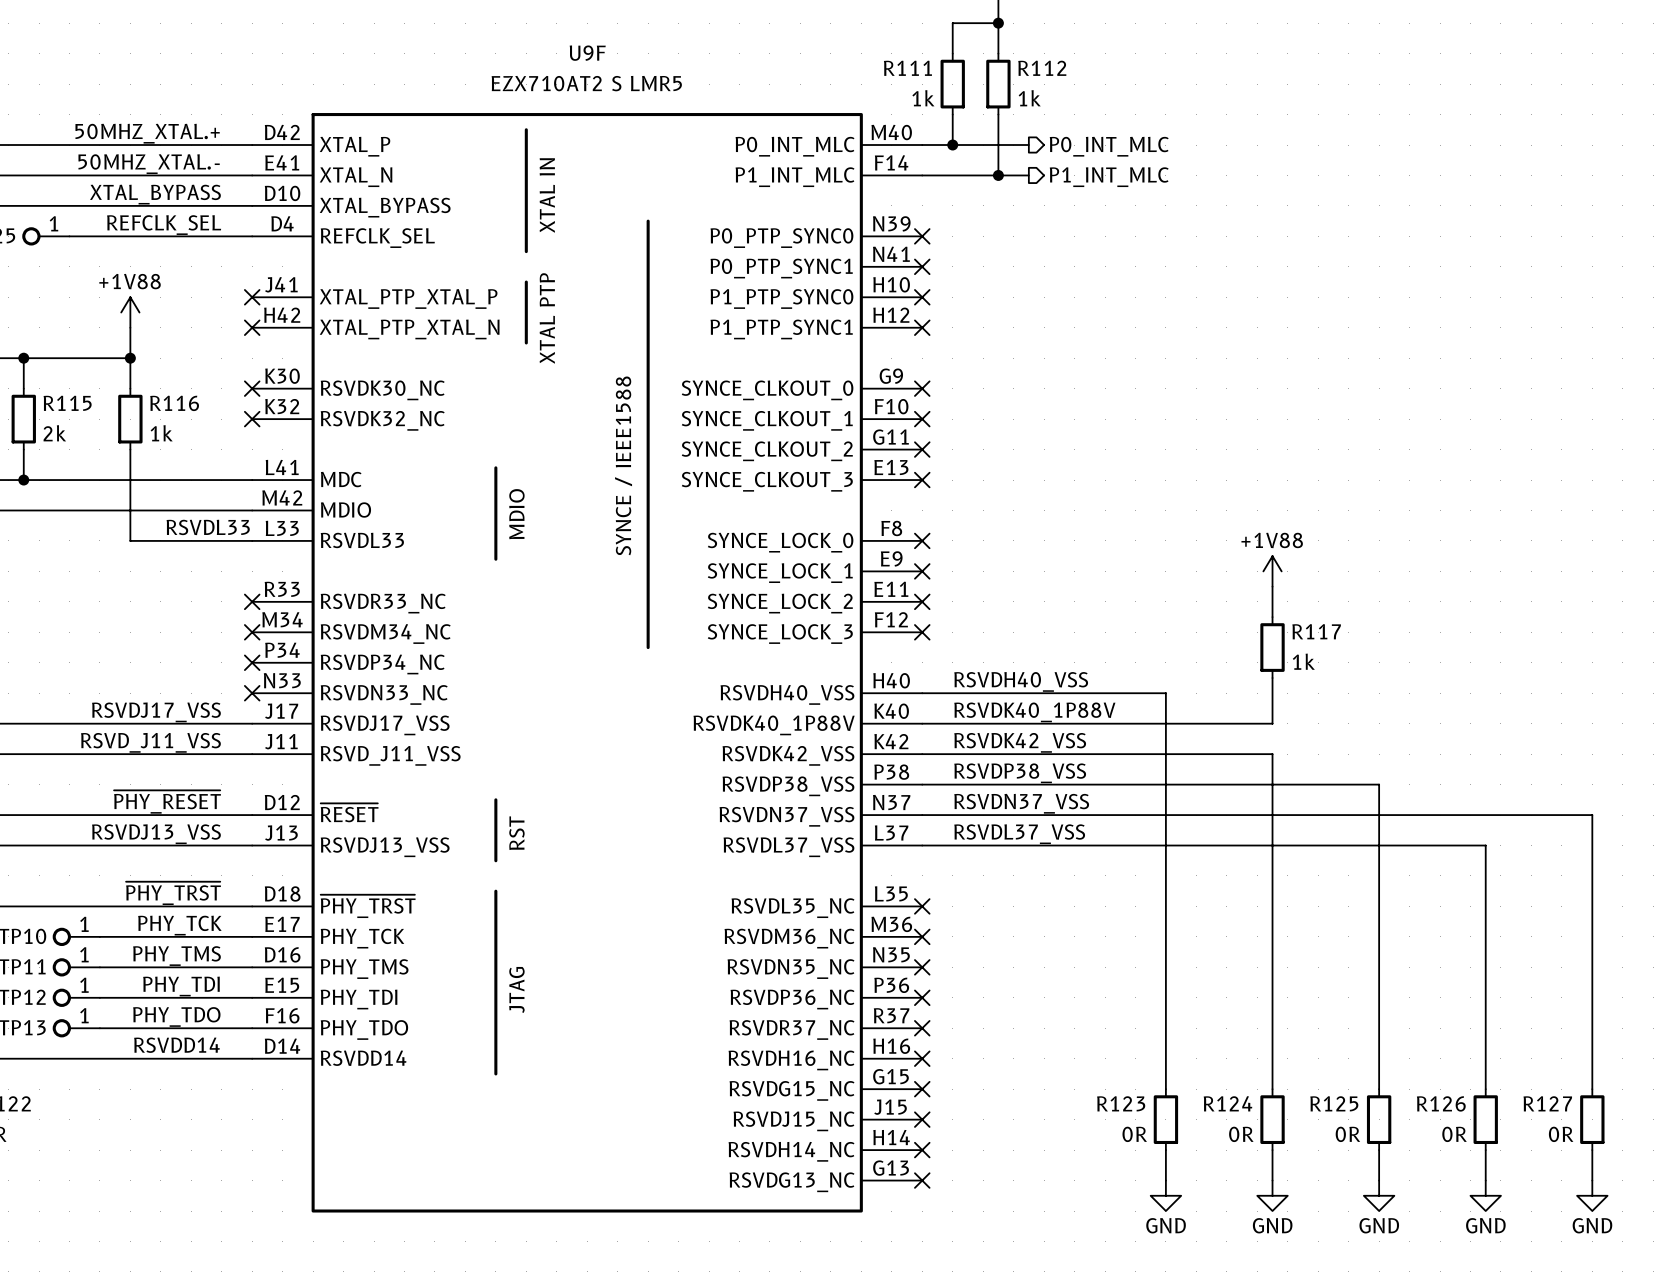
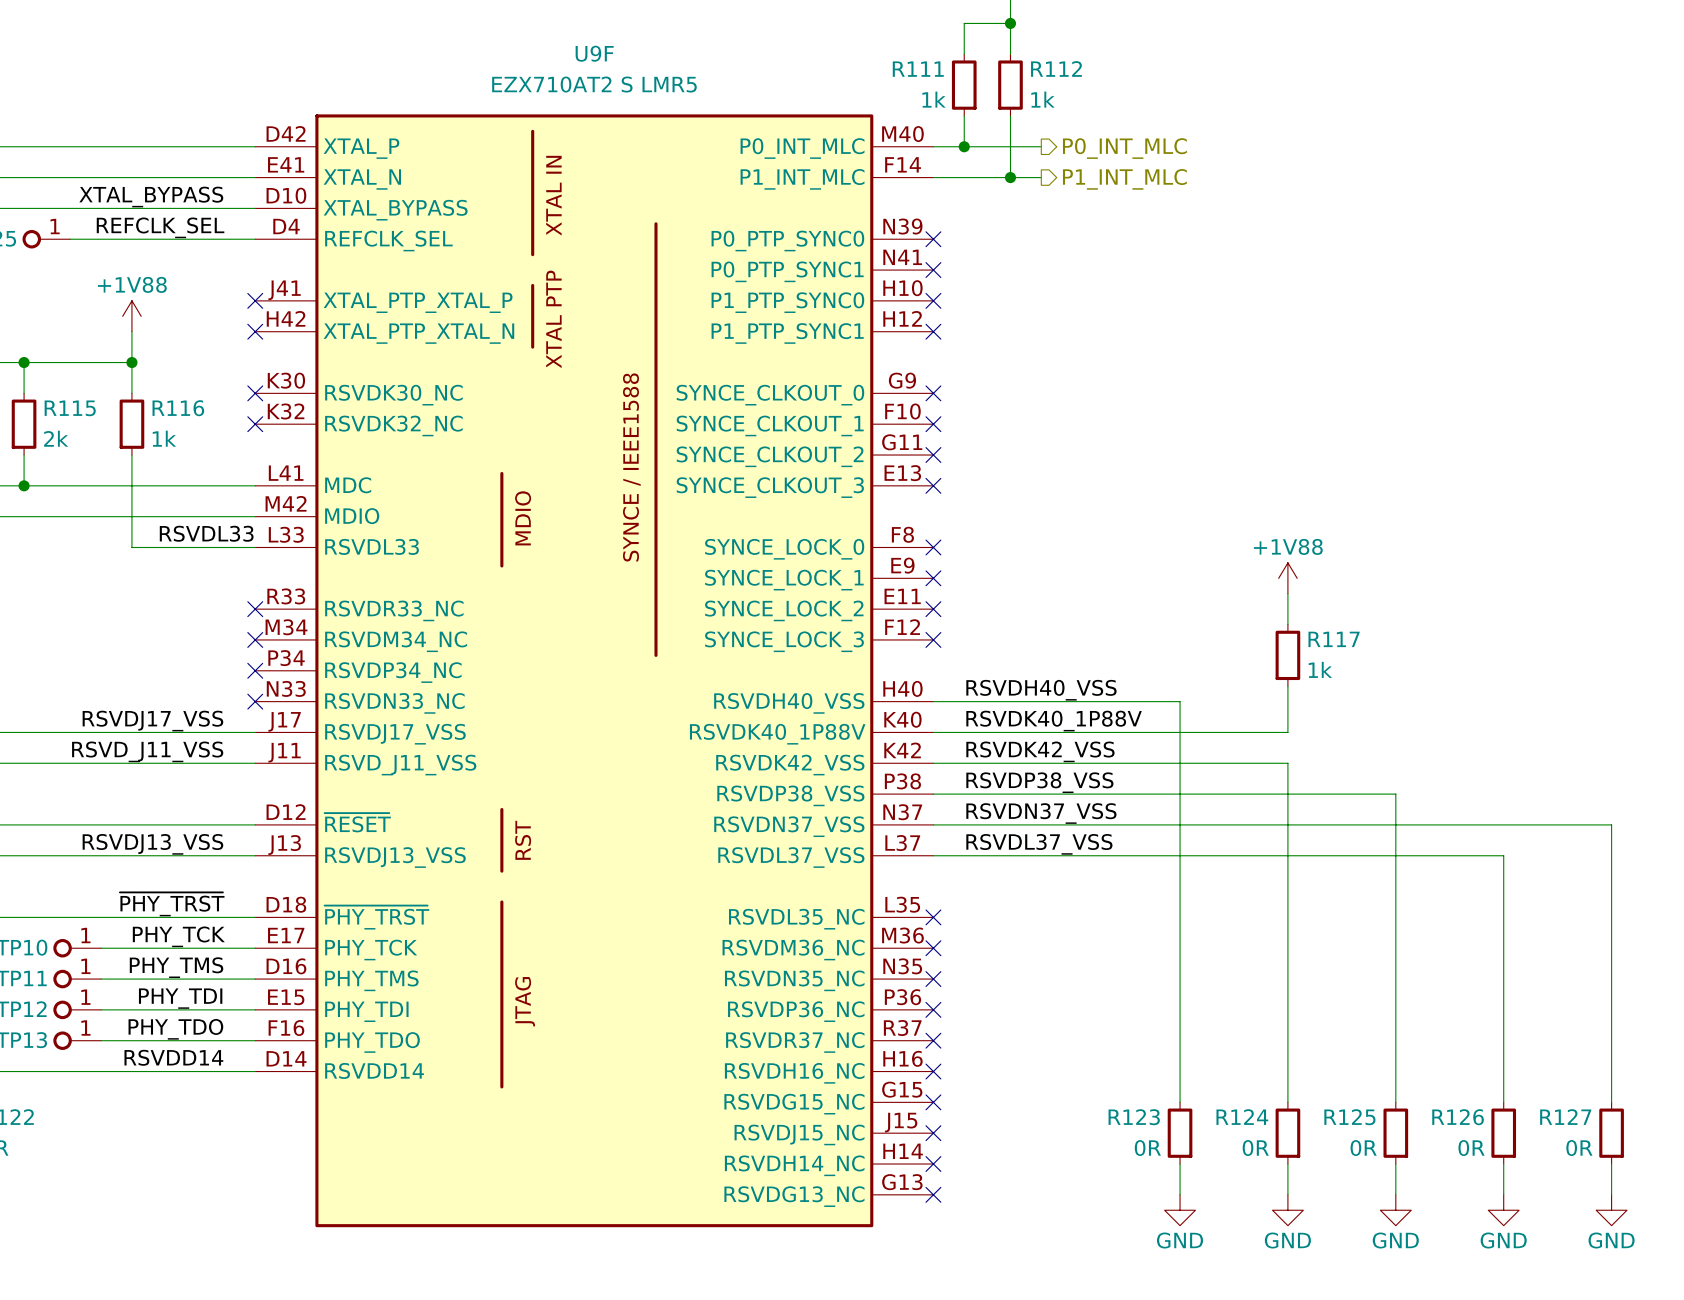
label: 50MHZ_XTAL.+ (147, 133) -> none
label: 50MHZ_XTAL.- (149, 164) -> none
label: ~{PHY_RESET} (167, 802) -> none

